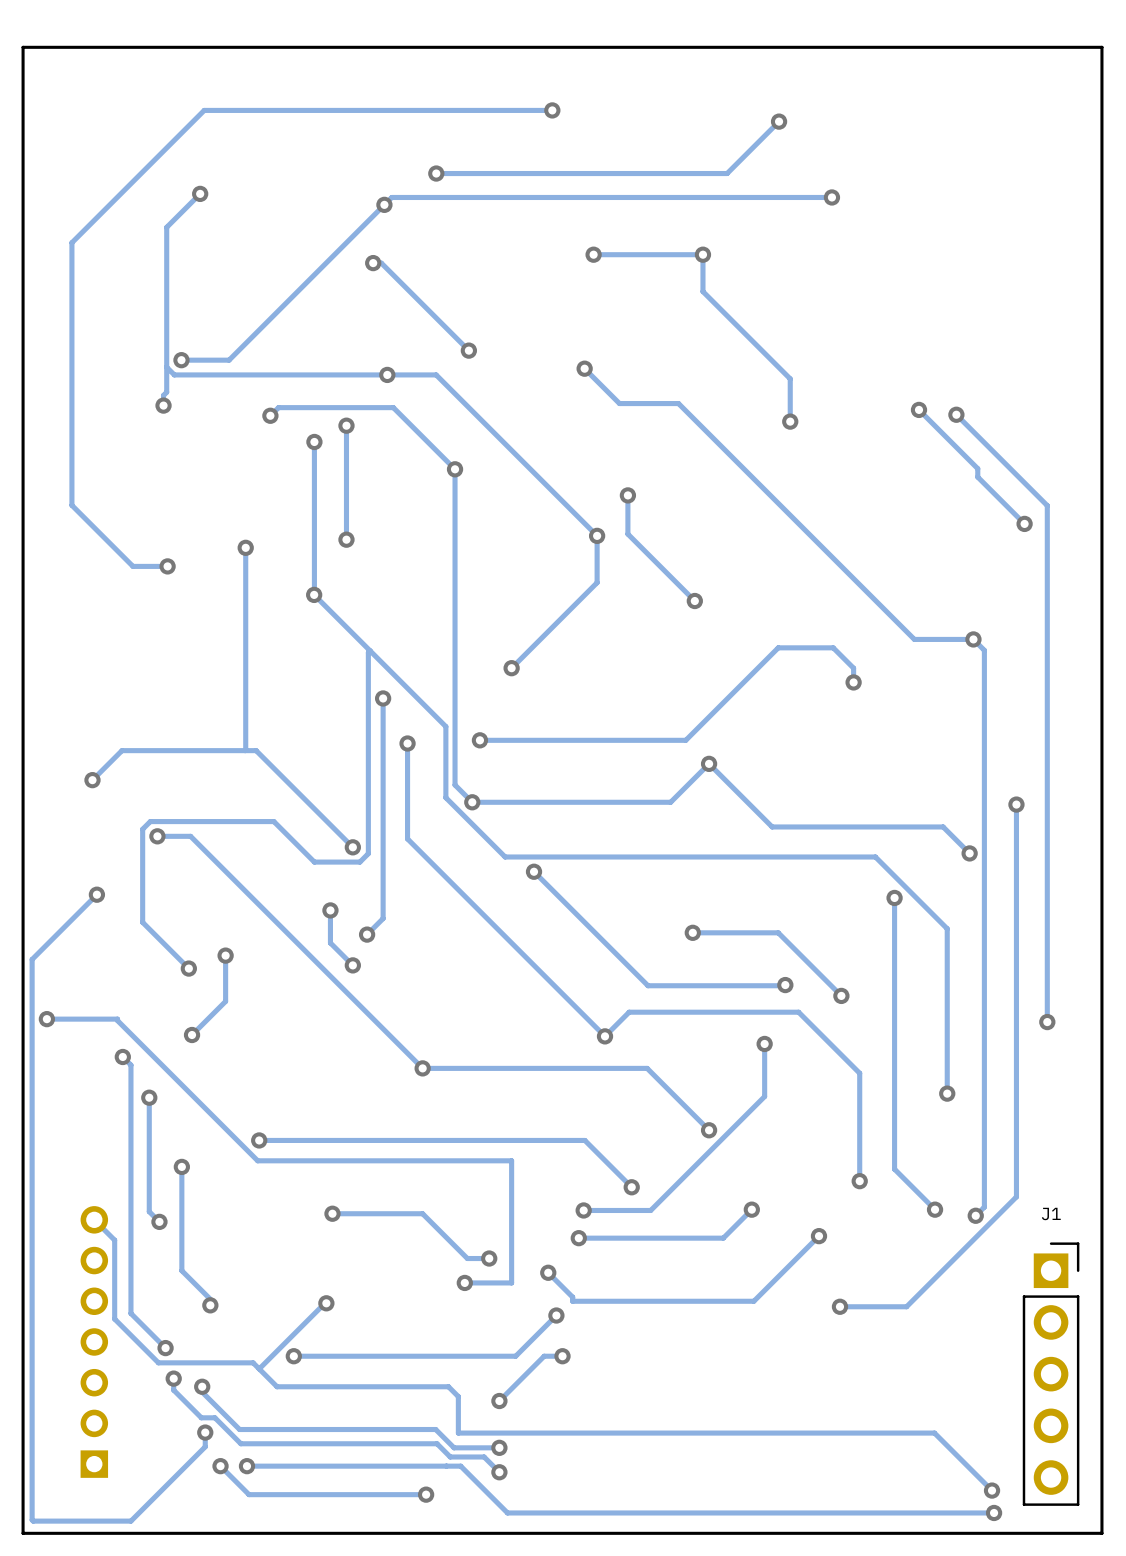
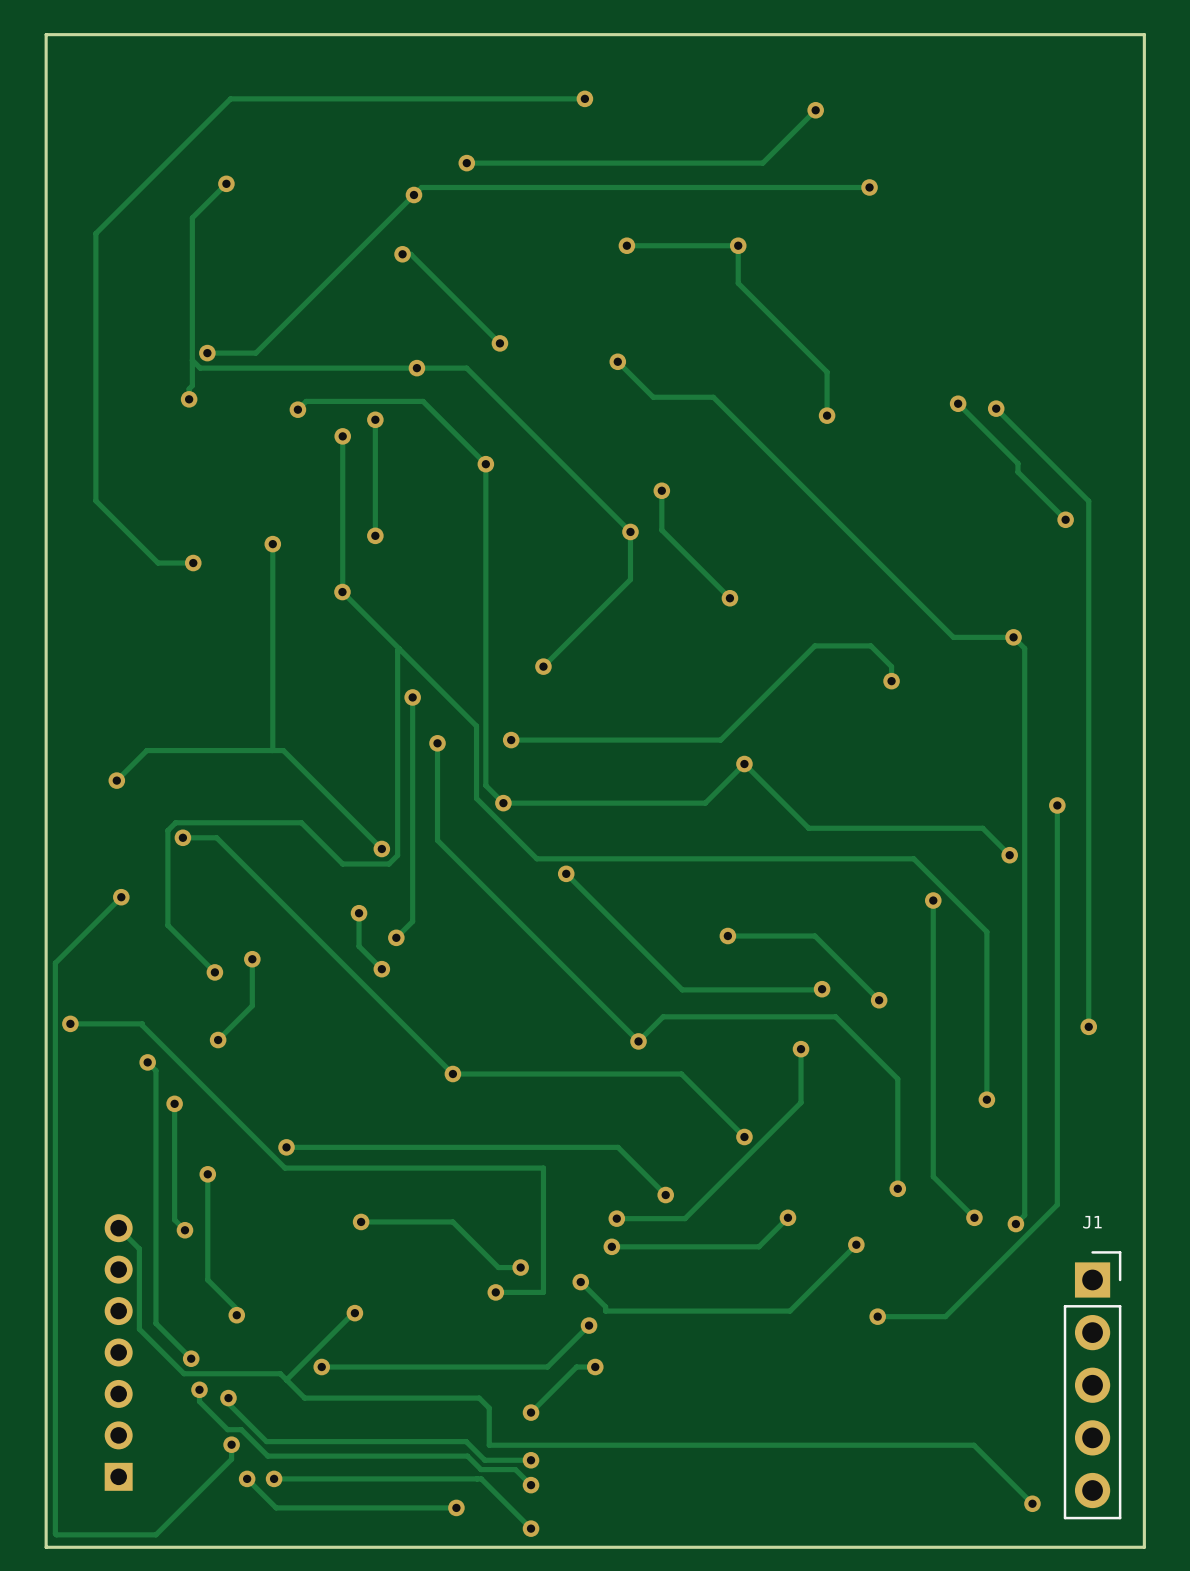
track: (450, 1466) (460, 1466) (507, 1512) (994, 1512) -> (481, 1478) (531, 1528)
via: (994, 1512) -> none
via: none -> (531, 1528)

